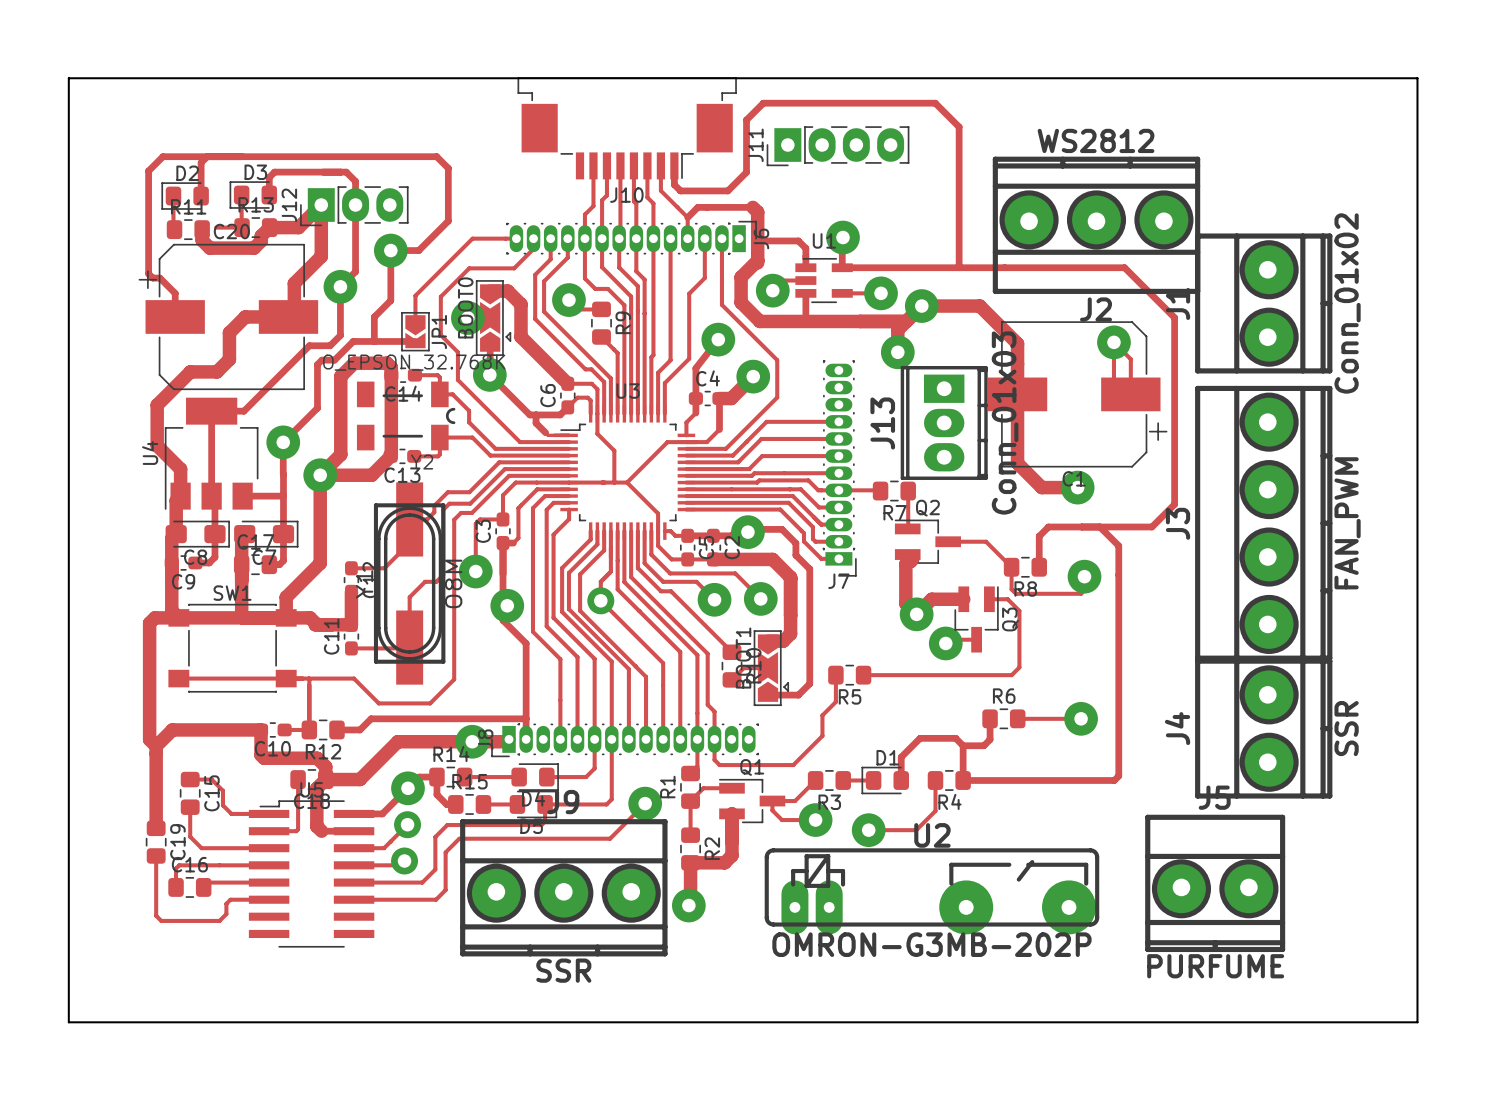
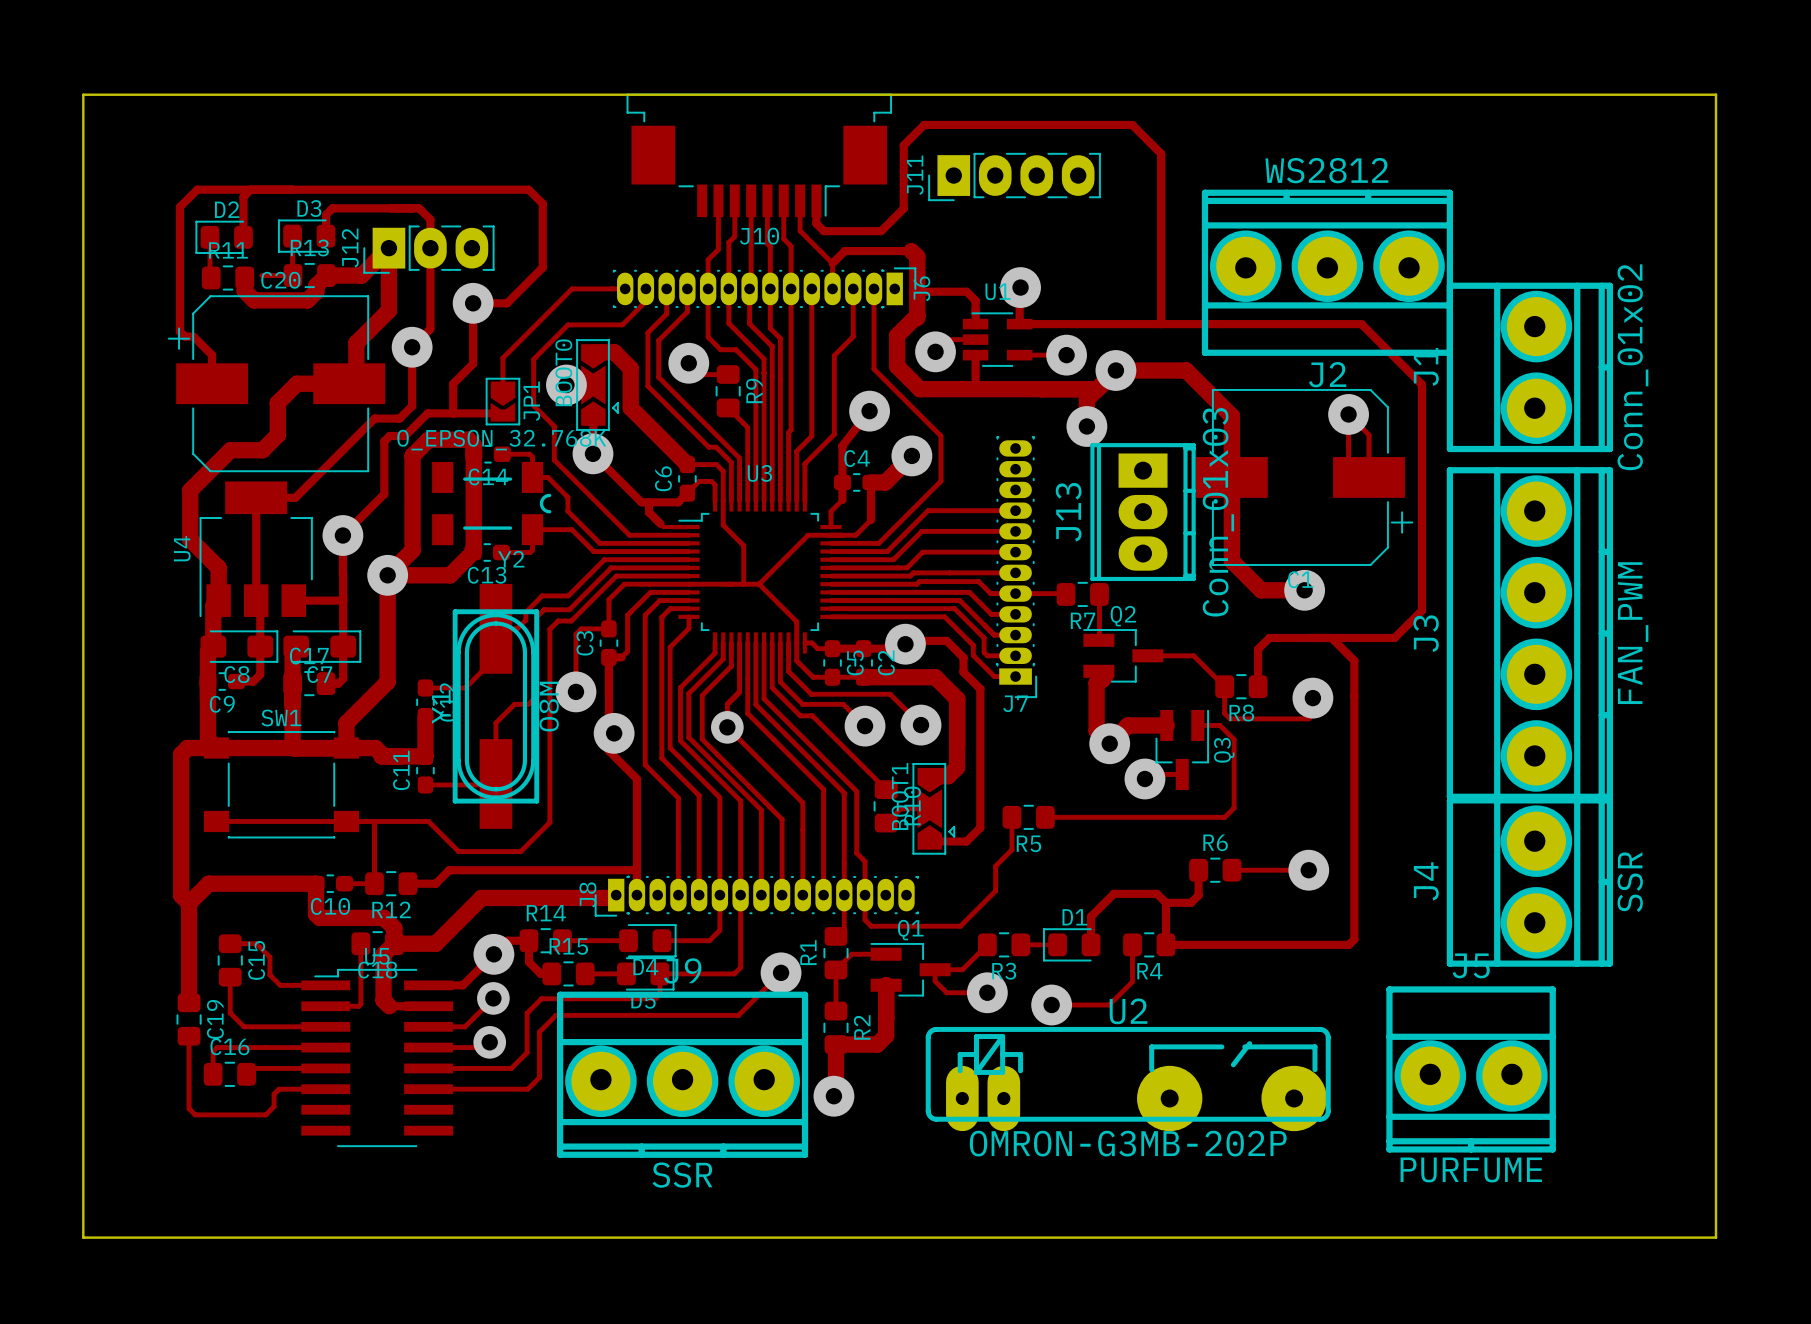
via: (472, 741) -> none

